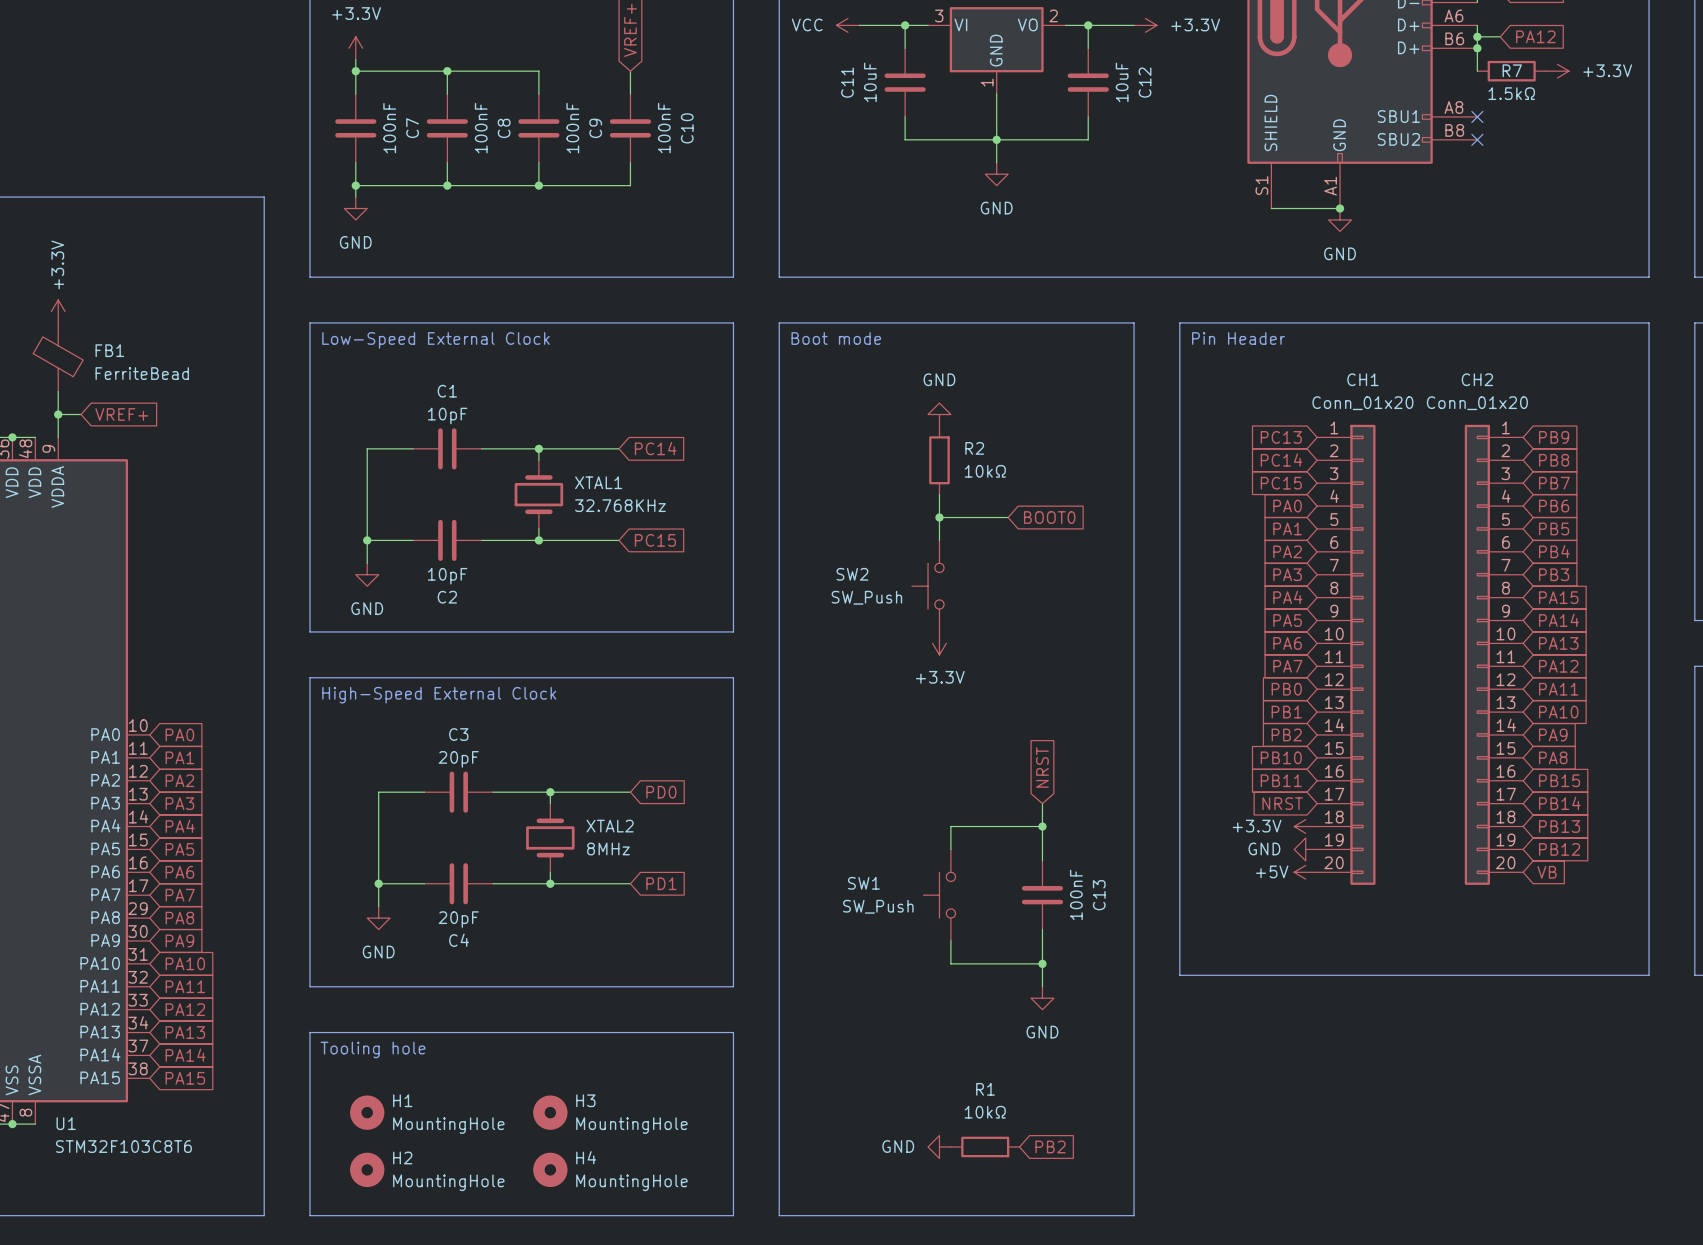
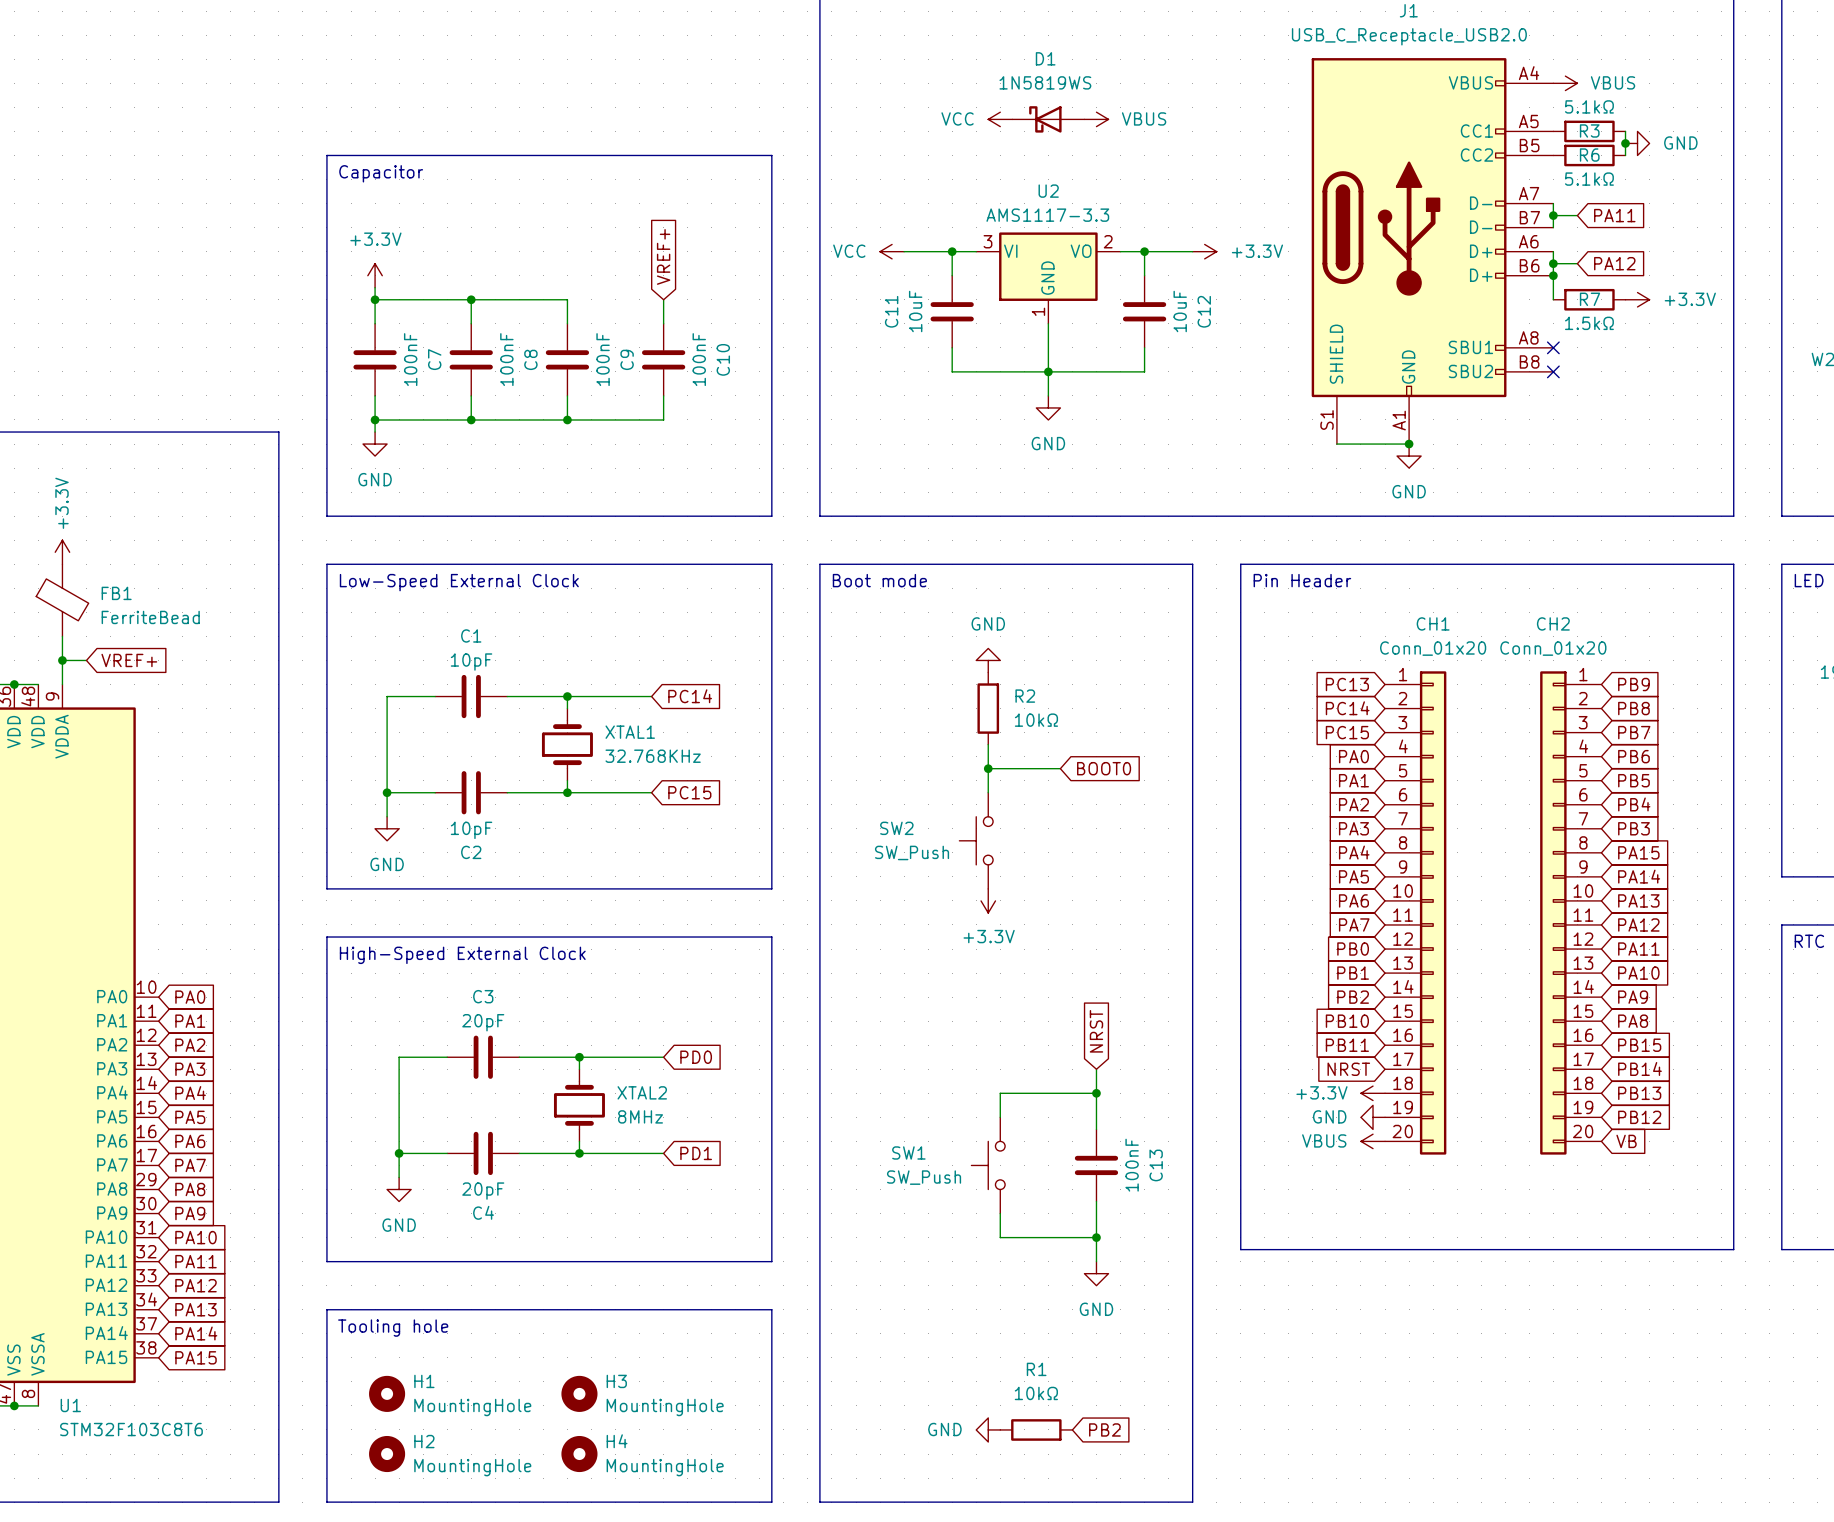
power symbol: +5V (1305, 872) -> VBUS (1373, 1141)

